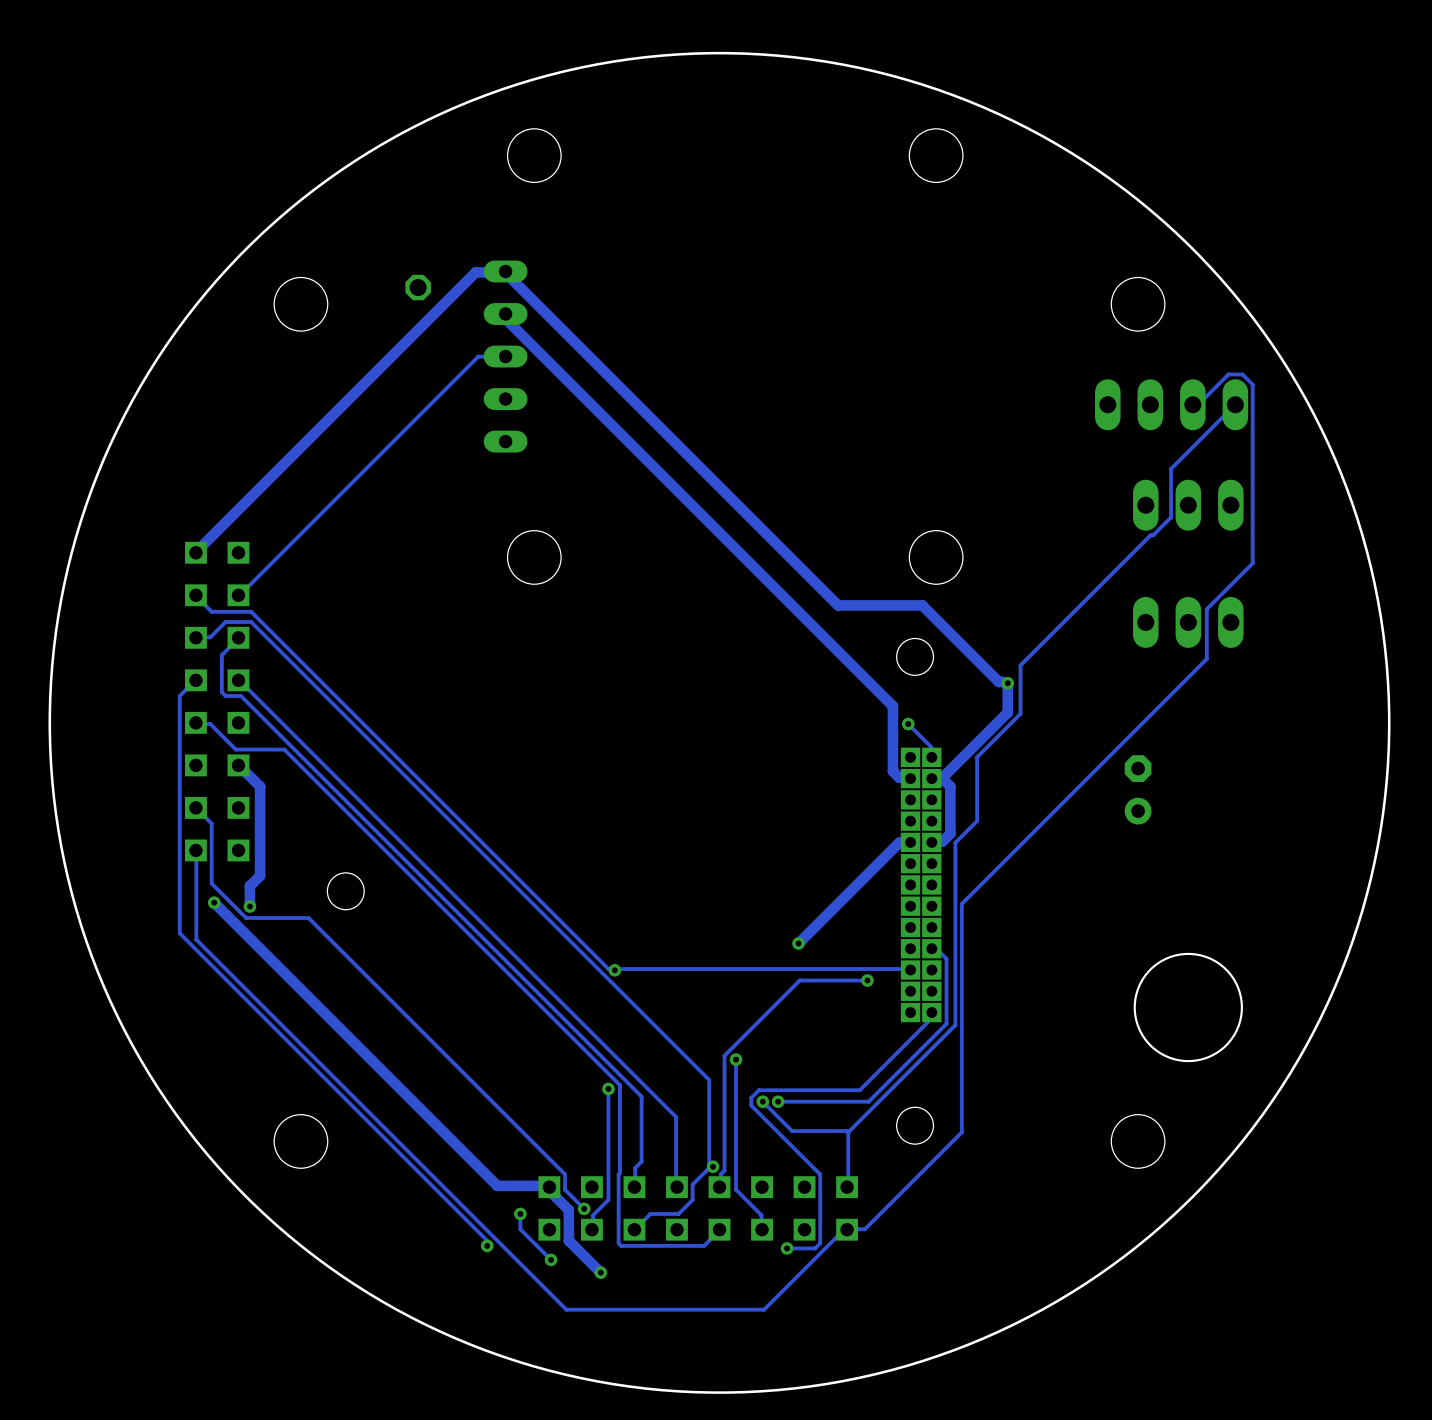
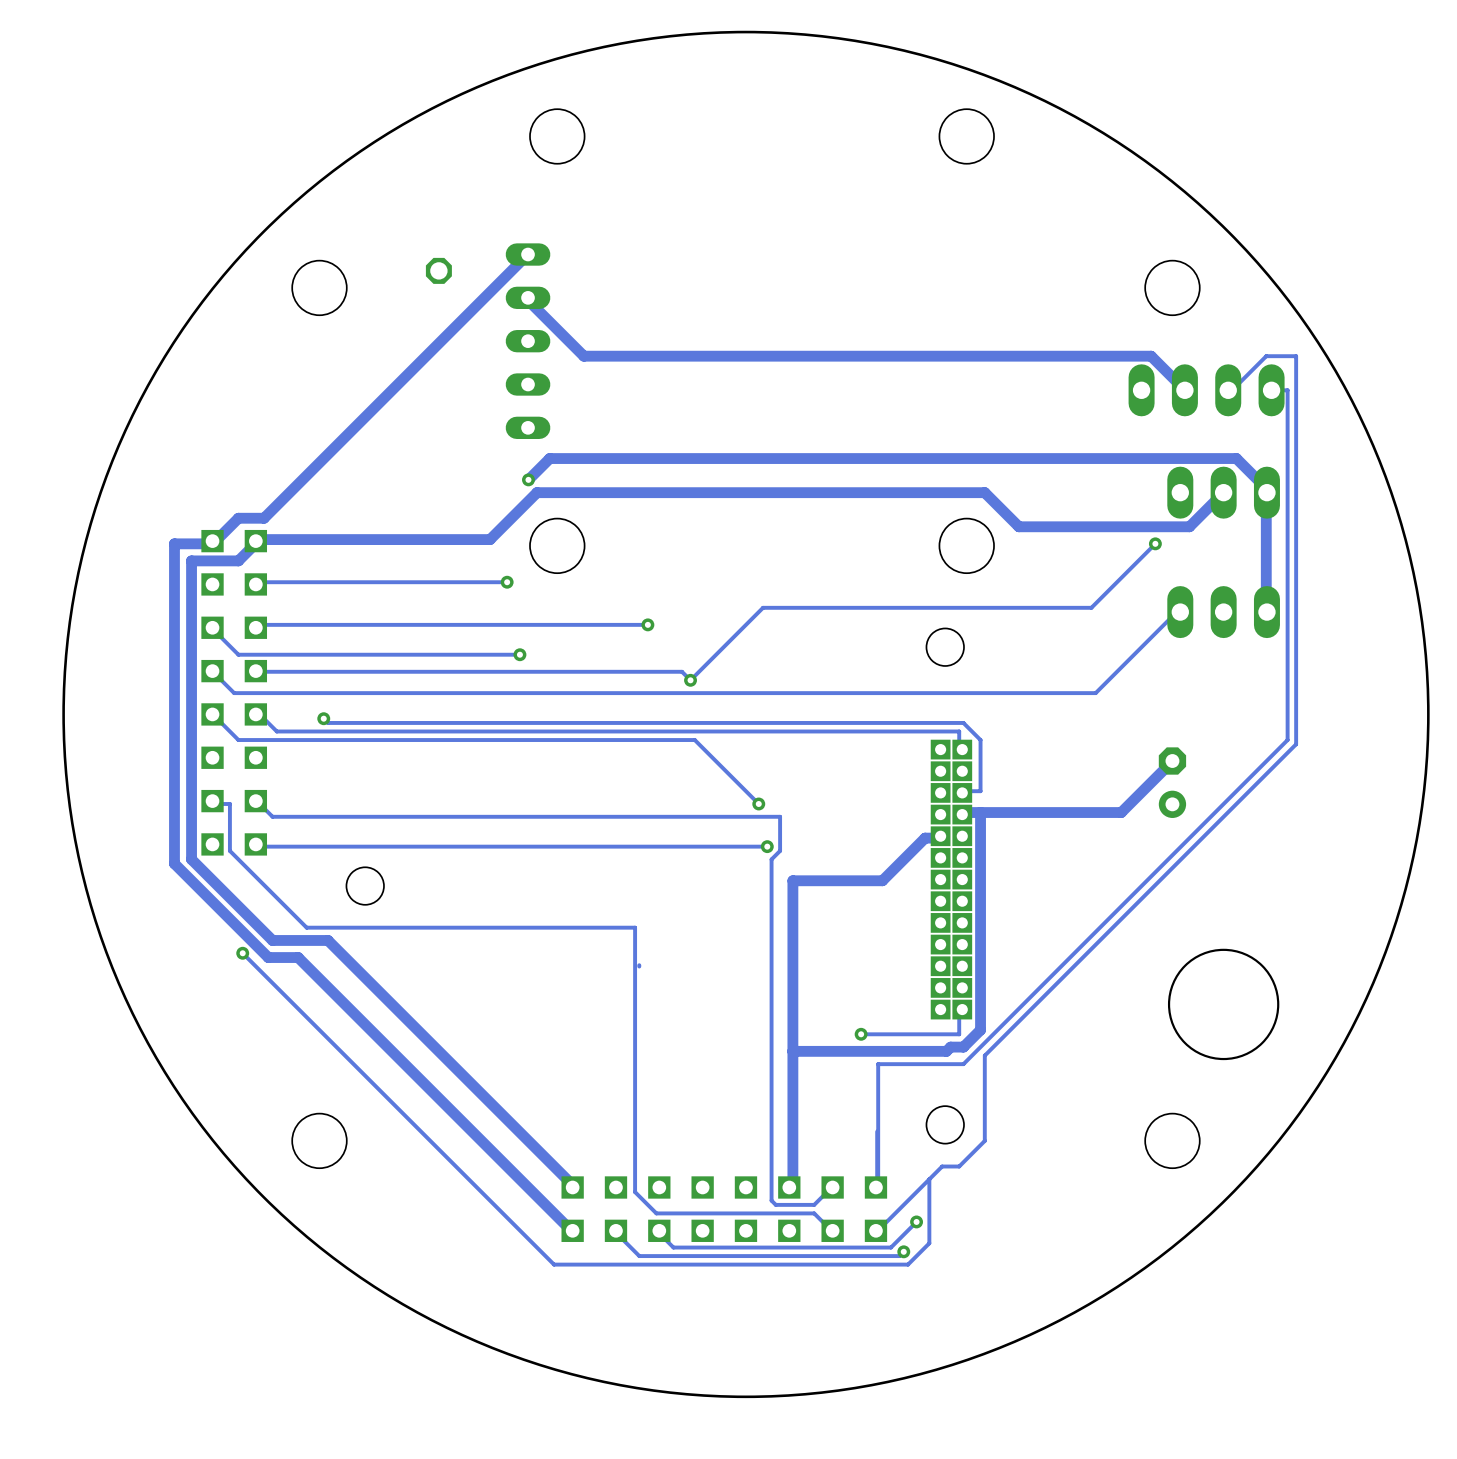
track: none -> (528, 254) (264, 518) (238, 518) (217, 539) (208, 543) (174, 543) (174, 863) (268, 957) (298, 957) (572, 1230)
track: (505, 314) (506, 319) (892, 706) (892, 771) (899, 777) (910, 778) -> (528, 297) (528, 300) (583, 356) (1151, 356) (1185, 390)
track: (505, 356) (478, 356) (238, 595) -> (507, 582) (259, 582) (255, 584)
track: (1192, 404) (1199, 403) (1228, 374) (1242, 374) (1252, 384) (1252, 563) (1206, 609) (1206, 658) (961, 903) (961, 1132) (864, 1229) (843, 1230) (764, 1309) (566, 1309) (196, 939) (195, 850) -> (1228, 390) (1232, 390) (1266, 356) (1296, 356) (1296, 744) (984, 1055) (984, 1140) (959, 1166) (942, 1166) (875, 1230)
track: (1235, 404) (1171, 468) (1171, 517) (1153, 535) (1150, 535) (1020, 665) (1020, 713) (977, 757) (977, 821) (955, 842) (955, 1025) (848, 1132) (792, 1131) (762, 1101) -> (1271, 390) (1287, 390) (1287, 740) (963, 1064) (878, 1064) (878, 1183) (875, 1187)
track: none -> (528, 479) (549, 458) (1236, 458) (1270, 492) (1266, 492) (1266, 496) (1266, 612)
via: none -> (528, 479)
track: none -> (1223, 492) (1189, 526) (1018, 526) (984, 492) (536, 492) (490, 539) (259, 539) (255, 541) (255, 543) (238, 560) (191, 560) (191, 859) (272, 940) (328, 940) (571, 1183) (572, 1187)
track: (195, 552) (475, 272) (505, 271) (838, 605) (922, 605) (998, 681) (1007, 683) (1007, 712) (942, 777) -> none
via: none -> (1155, 543)
via: none -> (507, 582)
track: (195, 595) (211, 611) (251, 611) (608, 969) (910, 970) -> none
via: none -> (647, 624)
track: (195, 637) (210, 637) (225, 621) (251, 621) (709, 1080) (709, 1165) (713, 1166) (710, 1166) (692, 1184) (692, 1199) (678, 1213) (650, 1213) (634, 1229) -> (212, 627) (238, 654) (519, 654)
track: (238, 637) (221, 655) (221, 692) (225, 695) (240, 695) (641, 1096) (641, 1161) (635, 1168) (634, 1187) -> (255, 627) (259, 624) (647, 624)
via: none -> (519, 654)
track: (195, 680) (179, 695) (179, 933) (487, 1240) (487, 1245) -> (212, 671) (234, 693) (1095, 693) (1176, 612) (1180, 612)
track: (238, 680) (676, 1117) (676, 1187) -> (255, 671) (682, 671) (690, 680) (763, 607) (1091, 607) (1155, 543)
via: (1007, 683) -> none
via: none -> (690, 680)
track: (195, 722) (210, 724) (235, 749) (284, 749) (619, 1085) (618, 1243) (621, 1245) (704, 1245) (719, 1229) -> (212, 714) (238, 740) (694, 740) (758, 803)
track: (908, 724) (931, 747) (931, 757) -> (255, 714) (259, 714) (276, 731) (959, 731) (959, 748) (962, 749)
via: (908, 724) -> none
track: none -> (323, 718) (328, 722) (963, 722) (980, 740) (980, 791) (963, 791) (962, 792)
via: none -> (323, 718)
track: (238, 765) (260, 786) (260, 875) (249, 886) (249, 906) -> none
track: none -> (1172, 761) (1121, 812) (963, 812) (962, 814)
track: (942, 777) (950, 786) (950, 833) (942, 841) (931, 842) -> none
track: (195, 807) (211, 823) (211, 883) (246, 917) (308, 917) (565, 1174) (565, 1189) (584, 1208) -> (212, 801) (212, 803) (229, 803) (229, 850) (306, 927) (635, 927) (635, 1192) (656, 1213) (814, 1213) (832, 1230)
track: none -> (255, 801) (272, 816) (780, 816) (780, 850) (771, 859) (771, 1200) (775, 1204) (814, 1204) (832, 1187)
via: none -> (758, 803)
track: none -> (980, 812) (980, 1030) (963, 1047) (950, 1047) (946, 1051) (792, 1051)
track: (910, 842) (899, 842) (798, 943) -> (940, 836) (937, 838) (925, 838) (882, 880) (792, 880) (792, 1183) (789, 1187)
track: none -> (255, 844) (259, 846) (767, 846)
via: none -> (767, 846)
track: (214, 902) (497, 1185) (548, 1185) (551, 1192) (568, 1210) (568, 1240) (600, 1272) -> none
via: (214, 902) -> none
via: (249, 906) -> none
via: (798, 943) -> none
track: (931, 948) (937, 949) (946, 958) (946, 1023) (868, 1101) (778, 1101) -> none
track: none -> (242, 953) (554, 1264) (908, 1264) (929, 1243) (929, 1179)
via: none -> (242, 953)
via: (614, 970) -> none
track: (867, 980) (799, 980) (724, 1055) (724, 1170) (720, 1174) (719, 1187) -> none
via: (867, 980) -> none
track: (931, 1012) (931, 1018) (859, 1090) (758, 1090) (751, 1097) (751, 1105) (820, 1174) (820, 1243) (815, 1248) (787, 1248) -> (962, 1009) (959, 1012) (959, 1034) (861, 1034)
via: none -> (861, 1034)
track: (736, 1059) (736, 1189) (761, 1215) (762, 1229) -> none
via: (736, 1059) -> none
track: (608, 1088) (608, 1199) (593, 1215) (591, 1229) -> (903, 1251) (899, 1256) (639, 1256) (615, 1230)
via: (608, 1088) -> none
via: (762, 1101) -> none
via: (778, 1101) -> none
via: (713, 1166) -> none
via: (584, 1208) -> none
track: (520, 1213) (520, 1229) (551, 1259) -> none
via: (520, 1213) -> none
track: none -> (916, 1221) (890, 1247) (673, 1247) (659, 1230)
via: none -> (916, 1221)
via: (487, 1245) -> none
via: (787, 1248) -> none
via: none -> (903, 1251)
via: (551, 1259) -> none
via: (600, 1272) -> none

